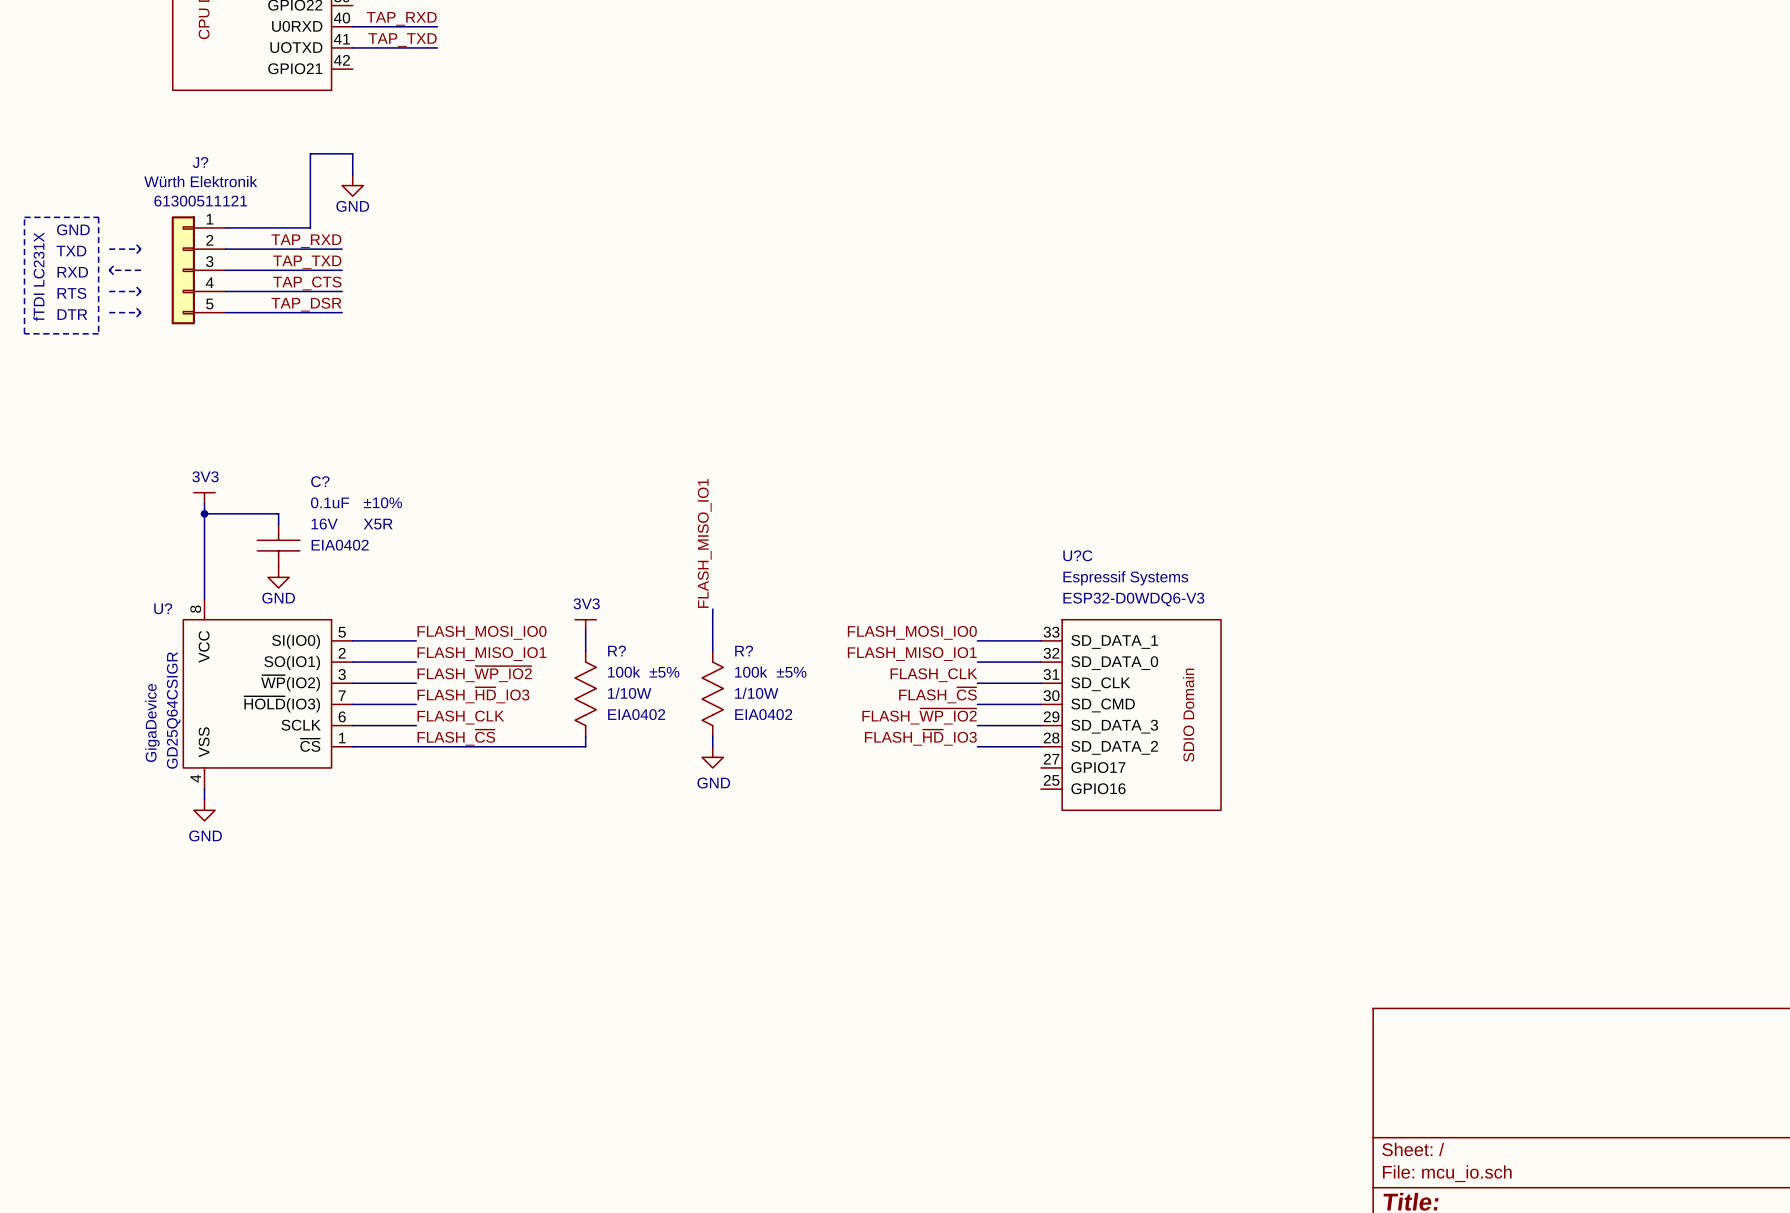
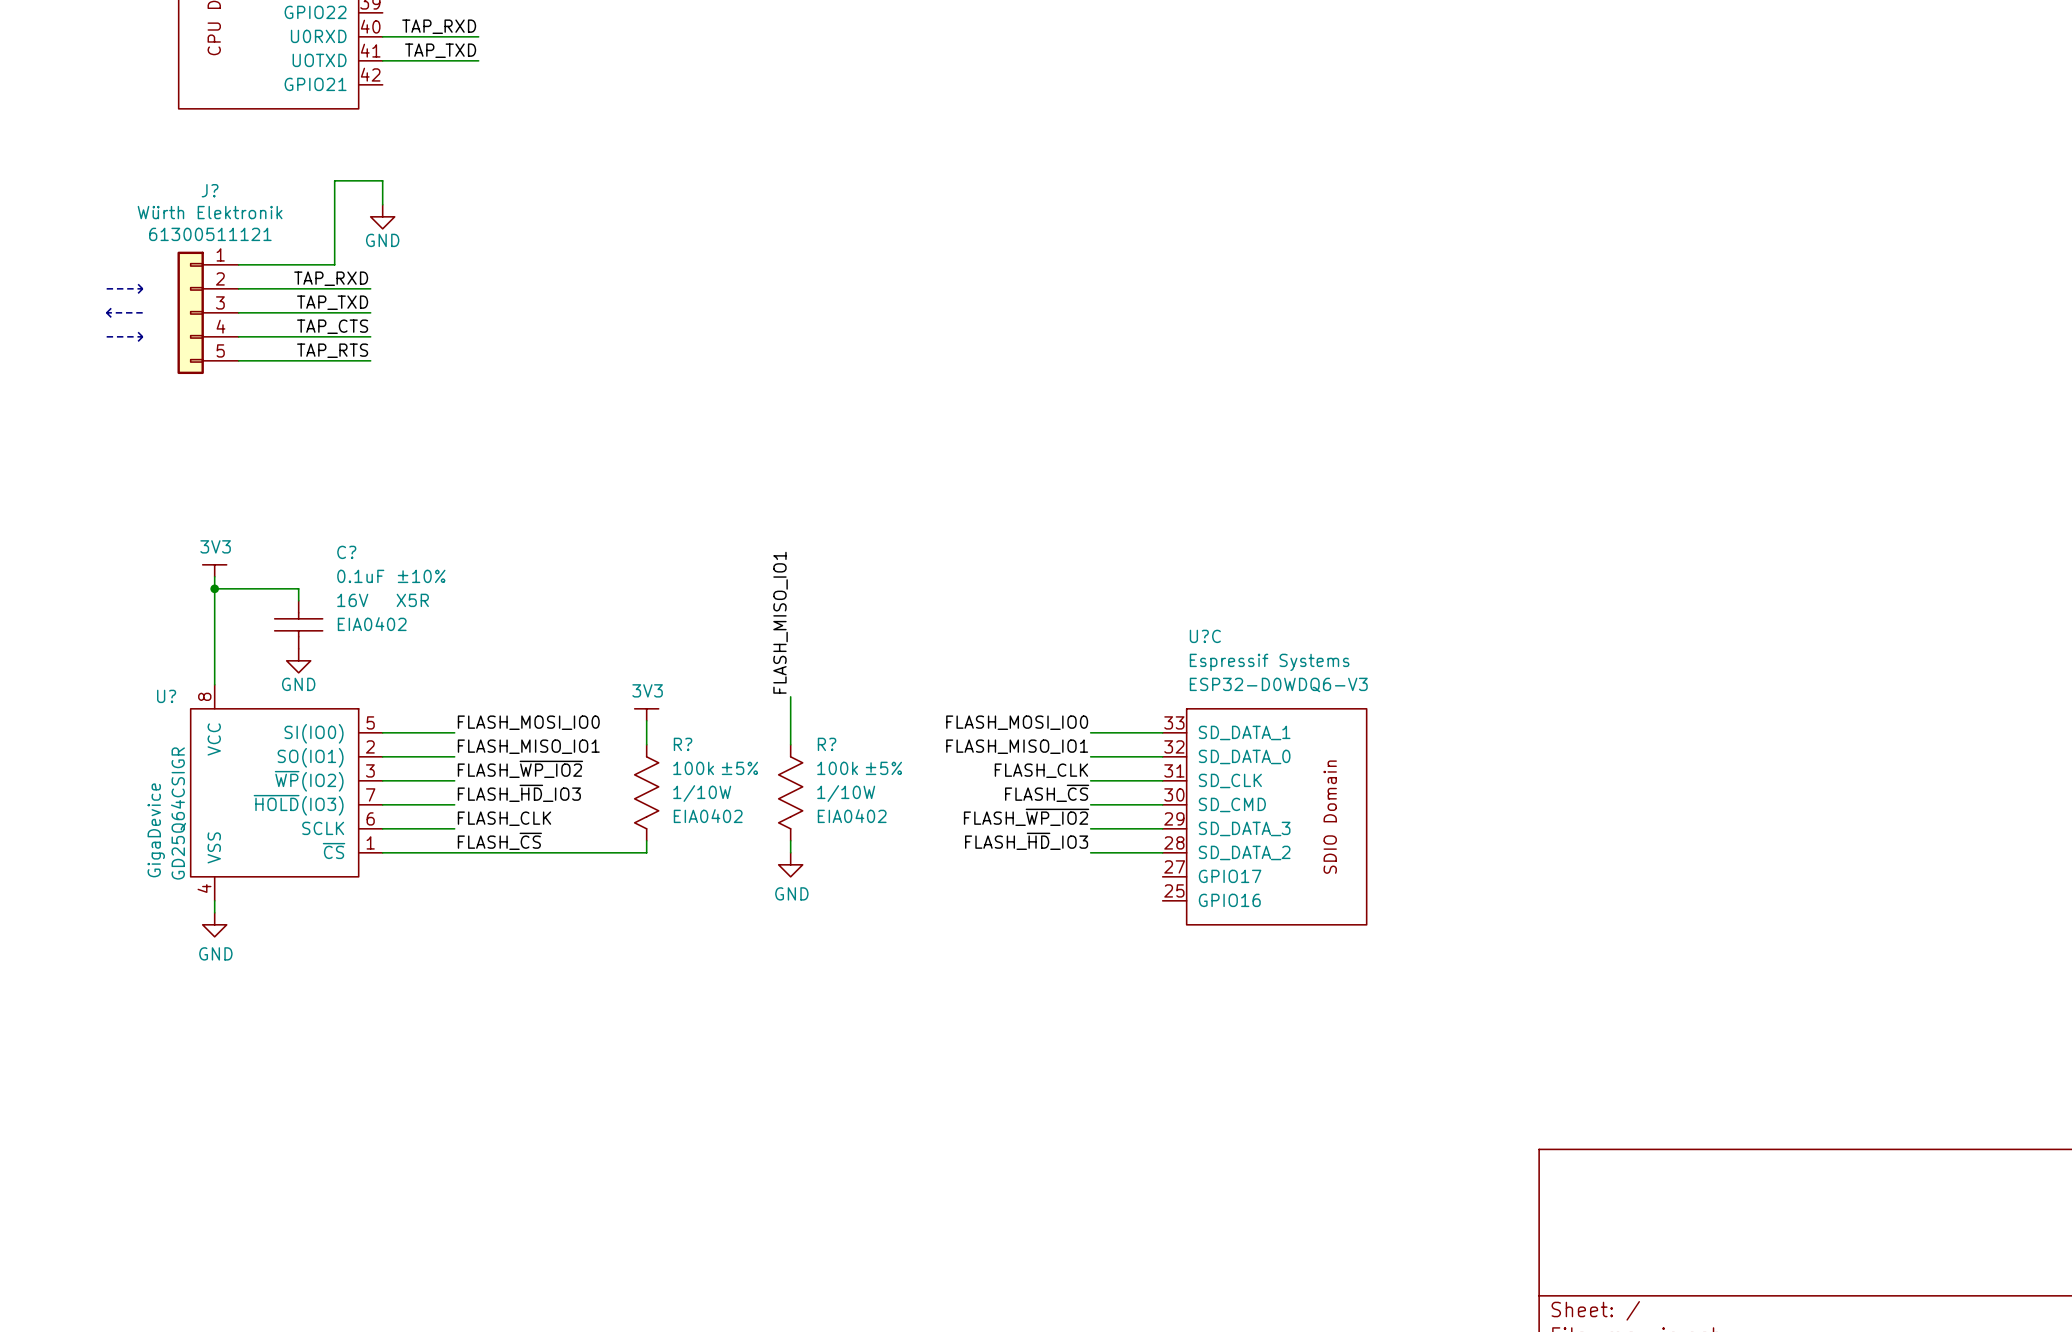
line: (24, 217) (98, 217) (98, 333) (24, 333) (24, 217) -> none
text: GND (73, 229) -> none
text: TXD (71, 251) -> none
text: RXD (72, 272) -> none
text: fTDI LC231X (38, 276) -> none
text: RTS (71, 293) -> none
label: TAP_DSR (306, 304) -> TAP_RTS (332, 350)
line: (135, 307) (140, 312) -> none
line: (109, 312) (140, 312) -> none
line: (140, 312) (135, 317) -> none
text: DTR (72, 314) -> none

